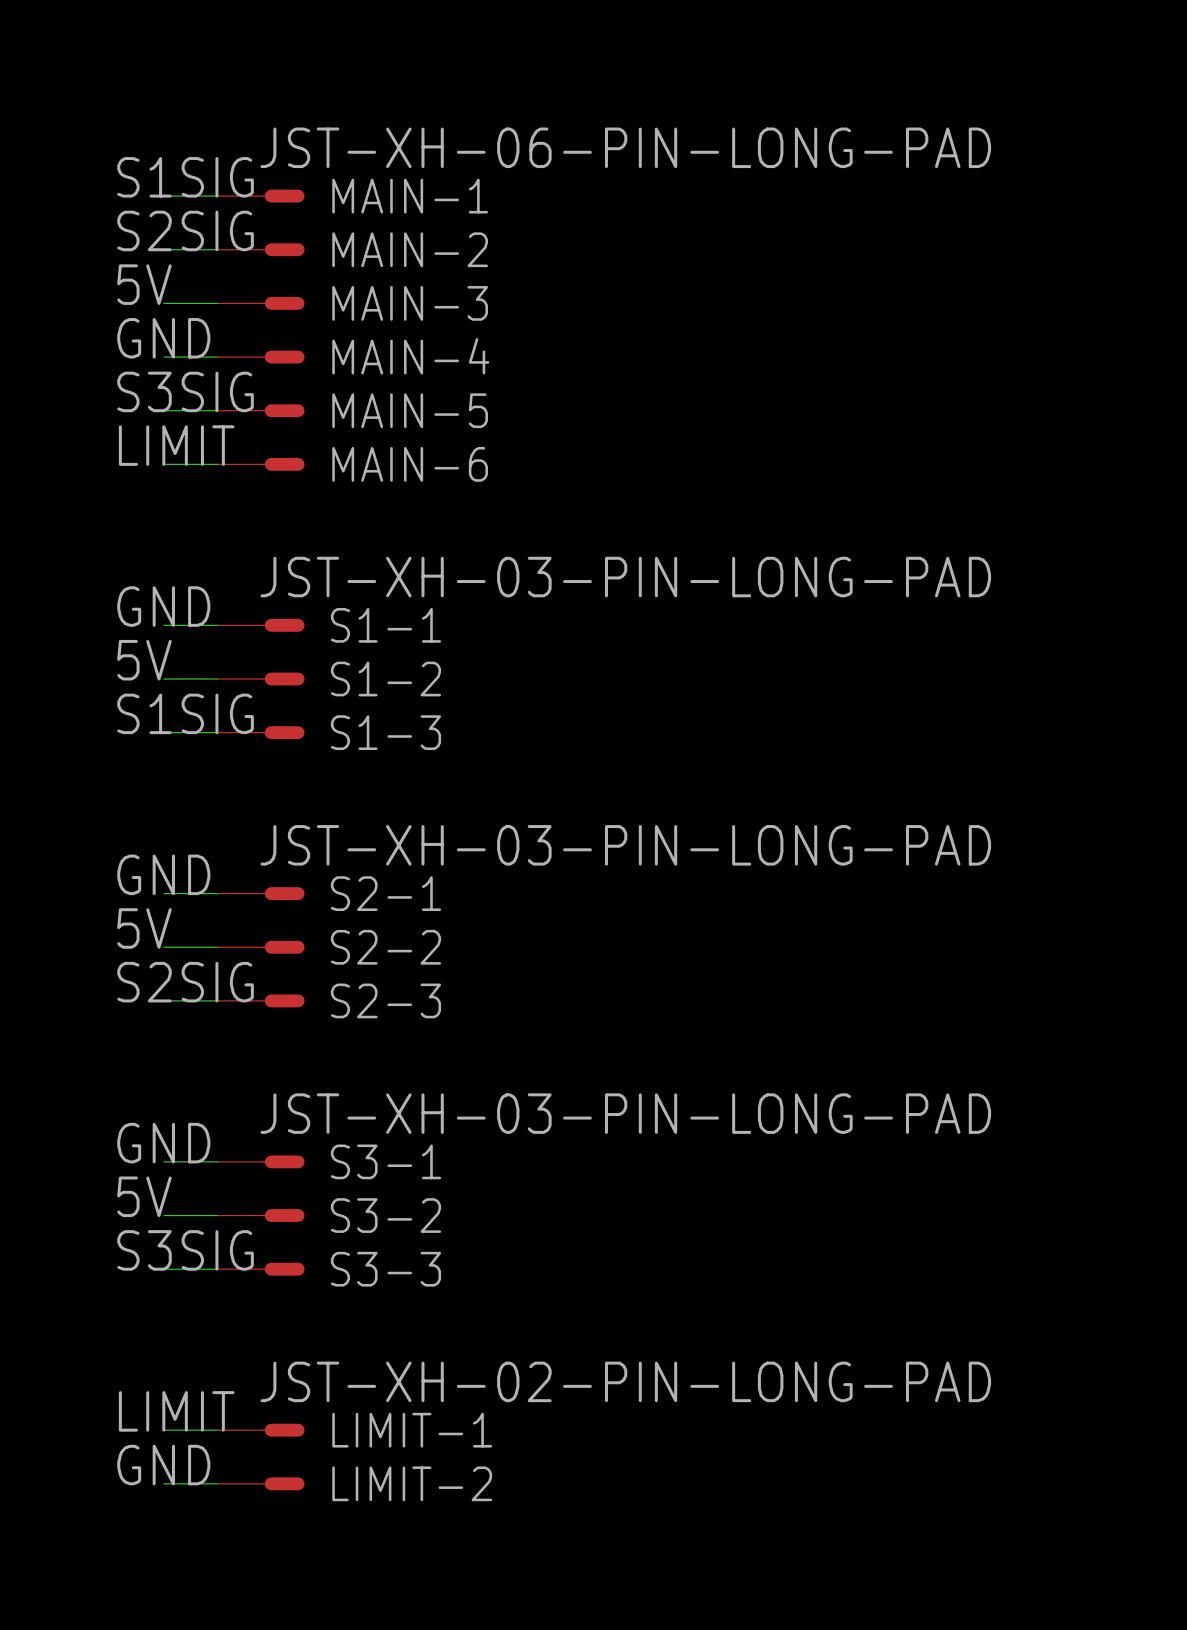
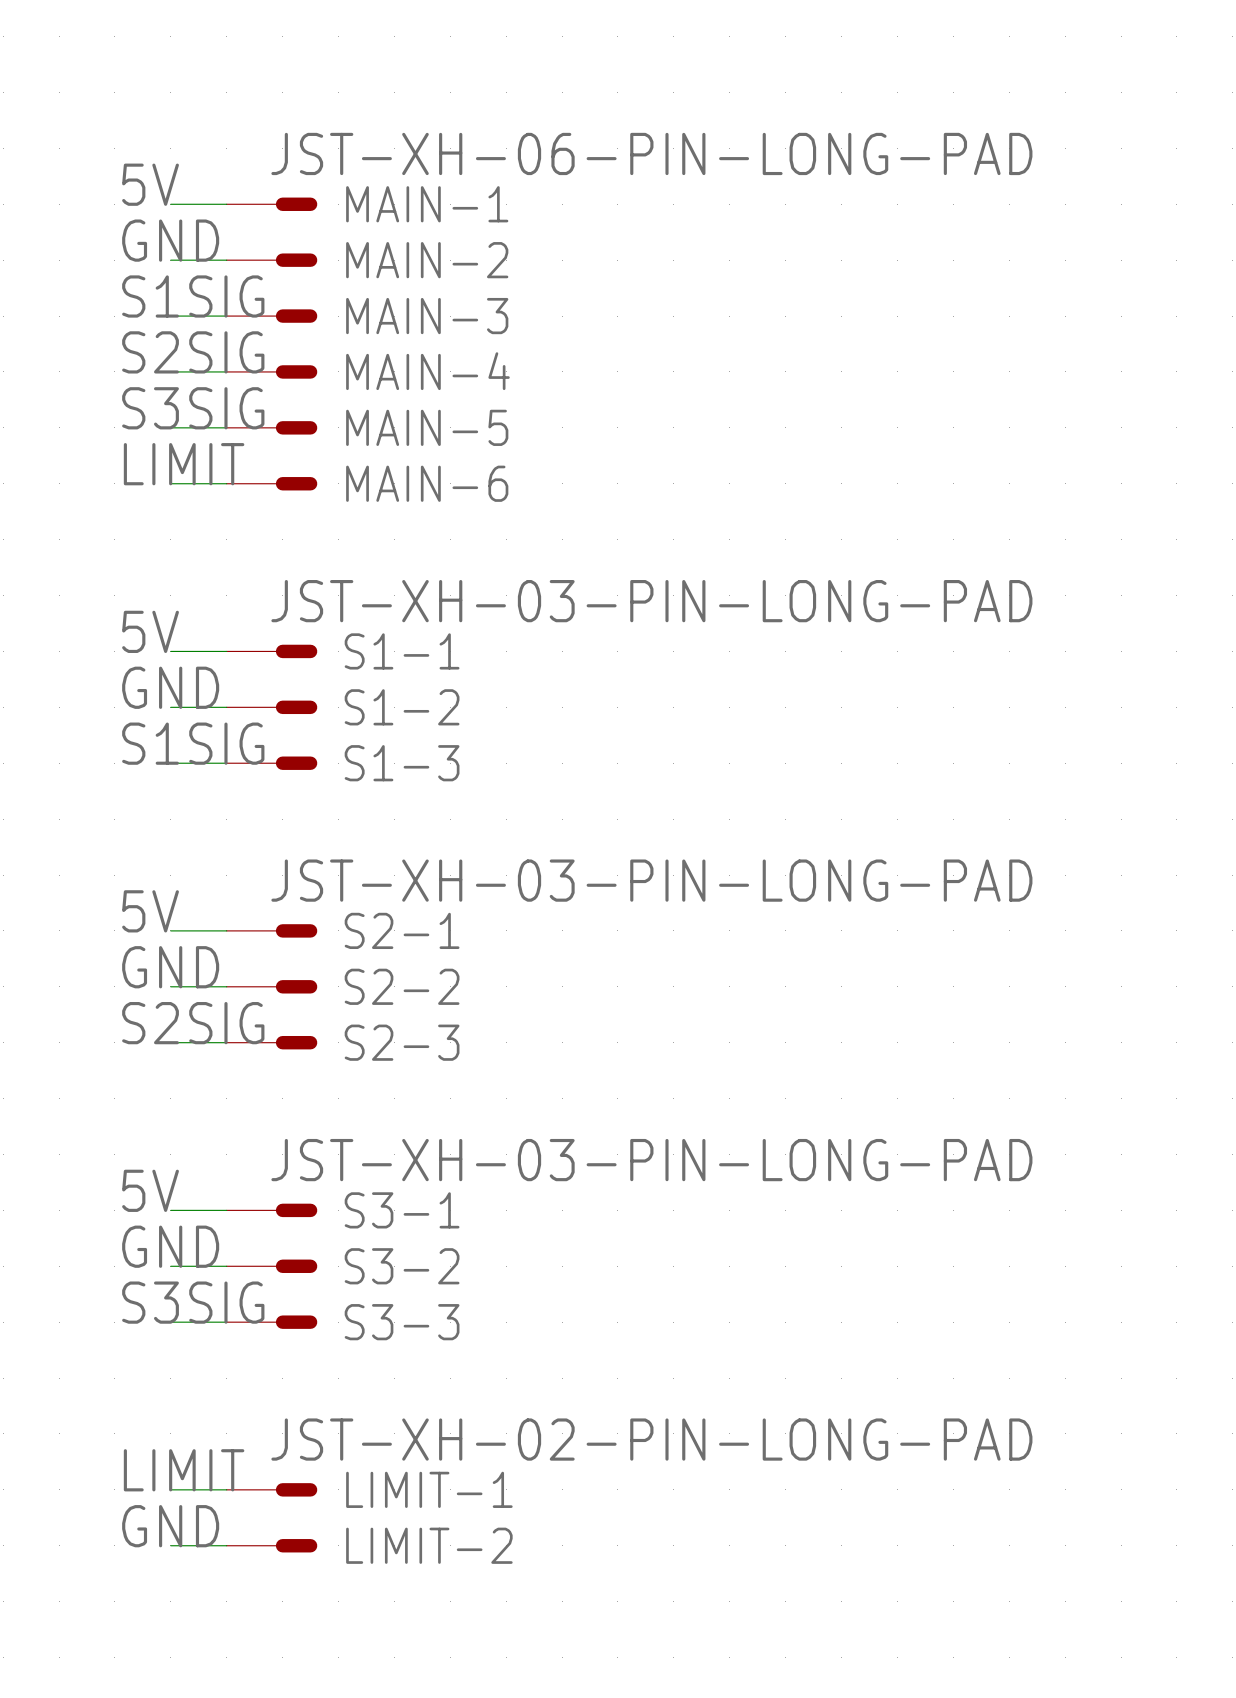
label: S1SIG (185, 177) -> 5V (150, 184)
label: S2SIG (185, 230) -> GND (170, 240)
label: 5V (144, 284) -> S1SIG (193, 296)
label: GND (163, 338) -> S2SIG (193, 352)
label: GND (163, 606) -> 5V (150, 631)
label: 5V (144, 660) -> GND (170, 687)
label: GND (163, 874) -> 5V (150, 911)
label: 5V (144, 928) -> GND (170, 967)
label: GND (163, 1143) -> 5V (150, 1190)
label: 5V (144, 1196) -> GND (170, 1246)

